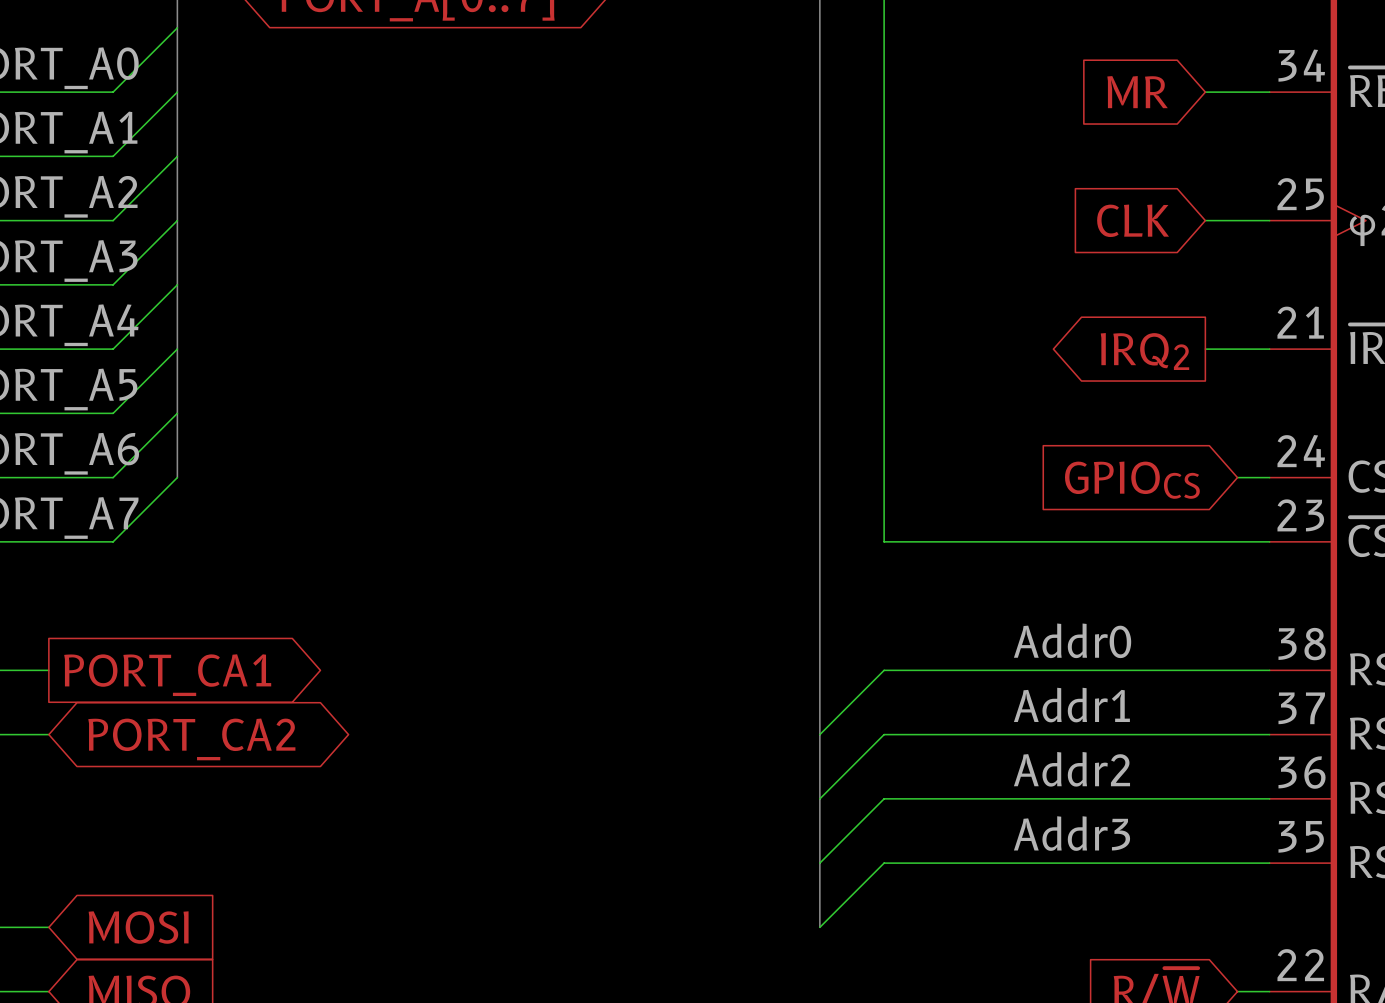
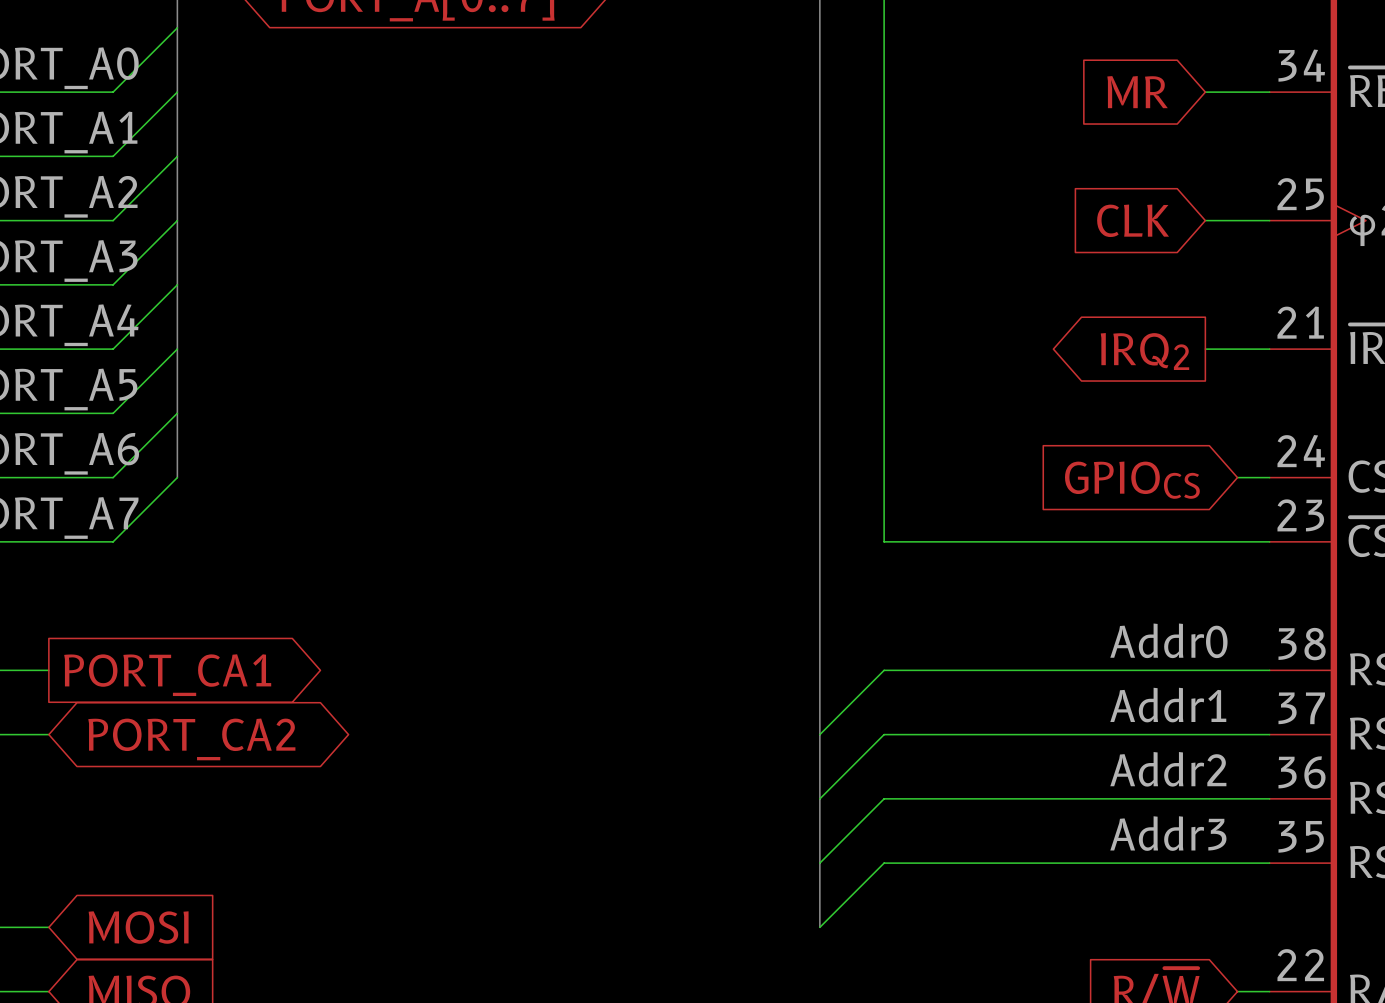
label position: Addr0 (1072, 640) -> Addr0 (1168, 640)
label position: Addr1 (1071, 705) -> Addr1 (1168, 705)
label position: Addr2 (1071, 769) -> Addr2 (1168, 769)
label position: Addr3 (1072, 833) -> Addr3 (1168, 833)

